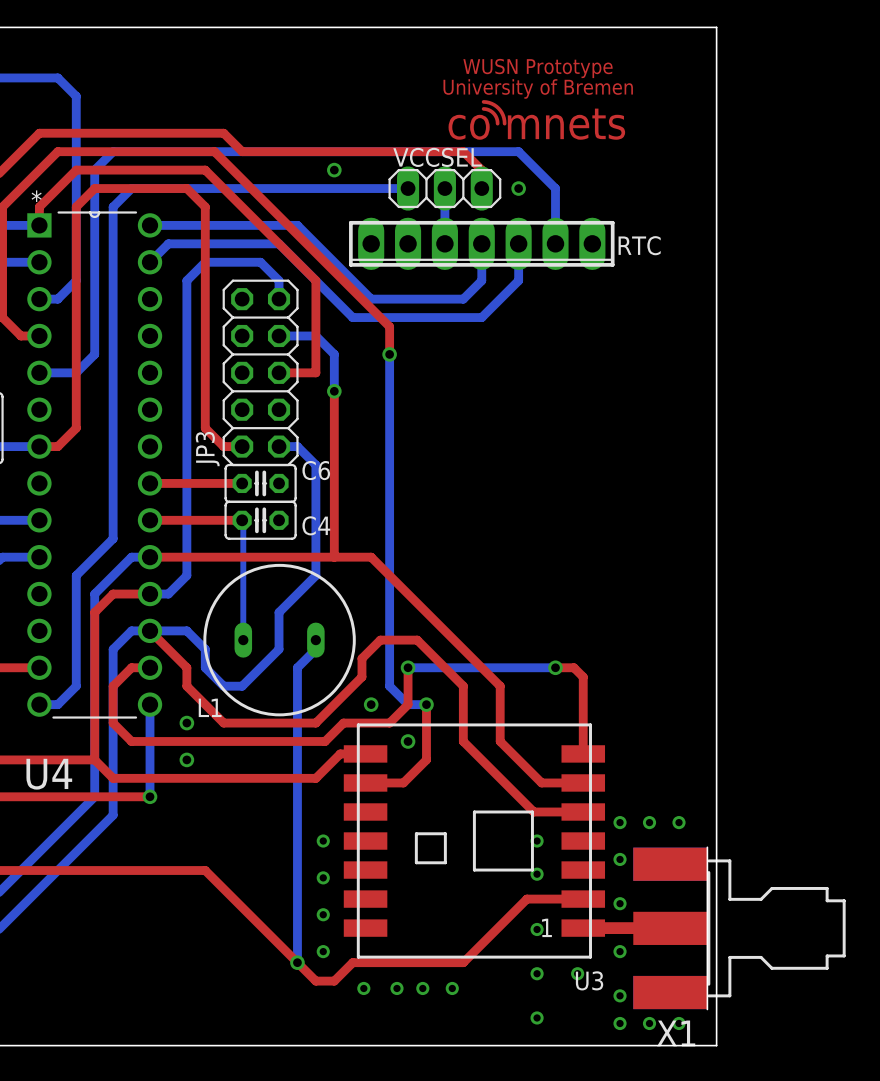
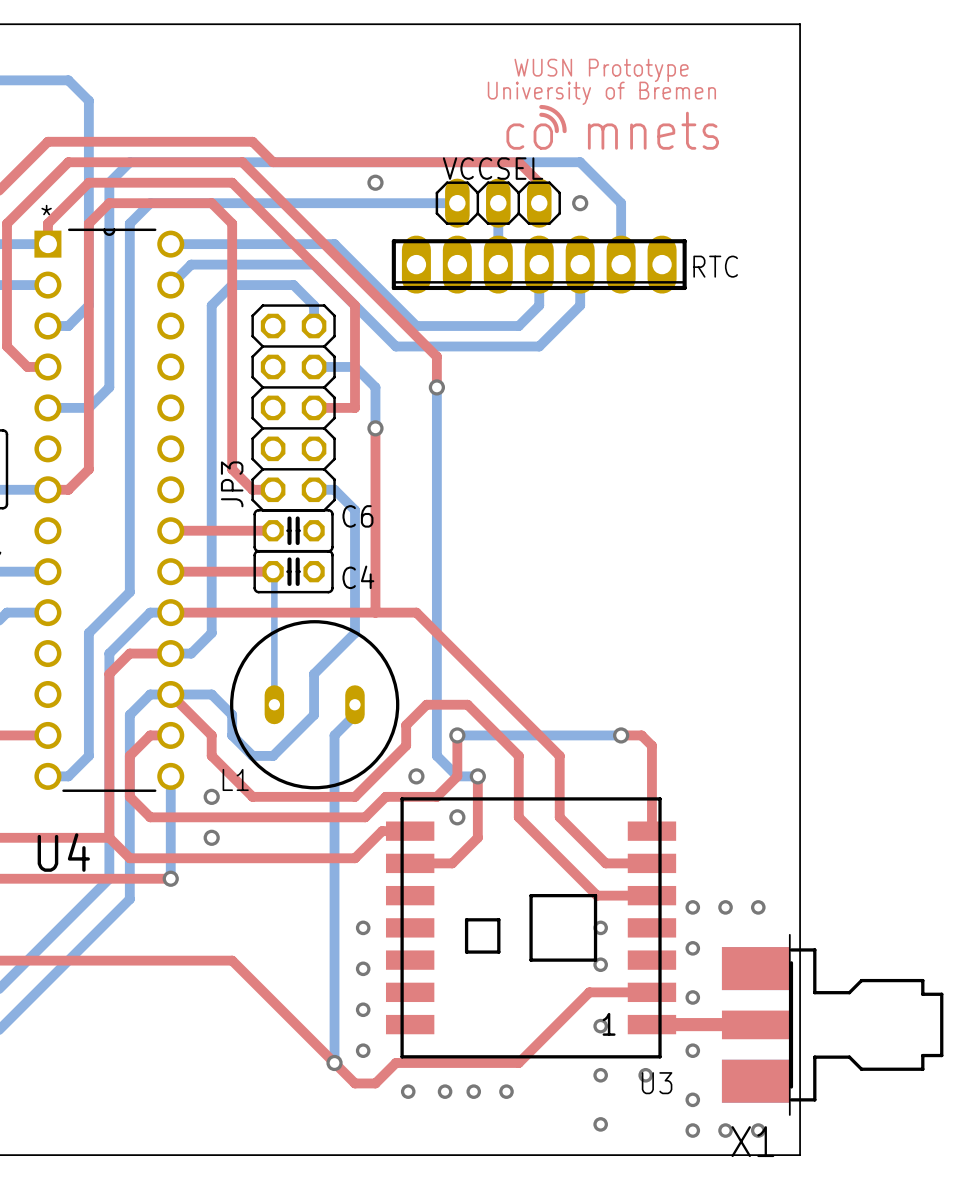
X1 footprint: [633, 847, 846, 1010] -> [721, 934, 944, 1115]

